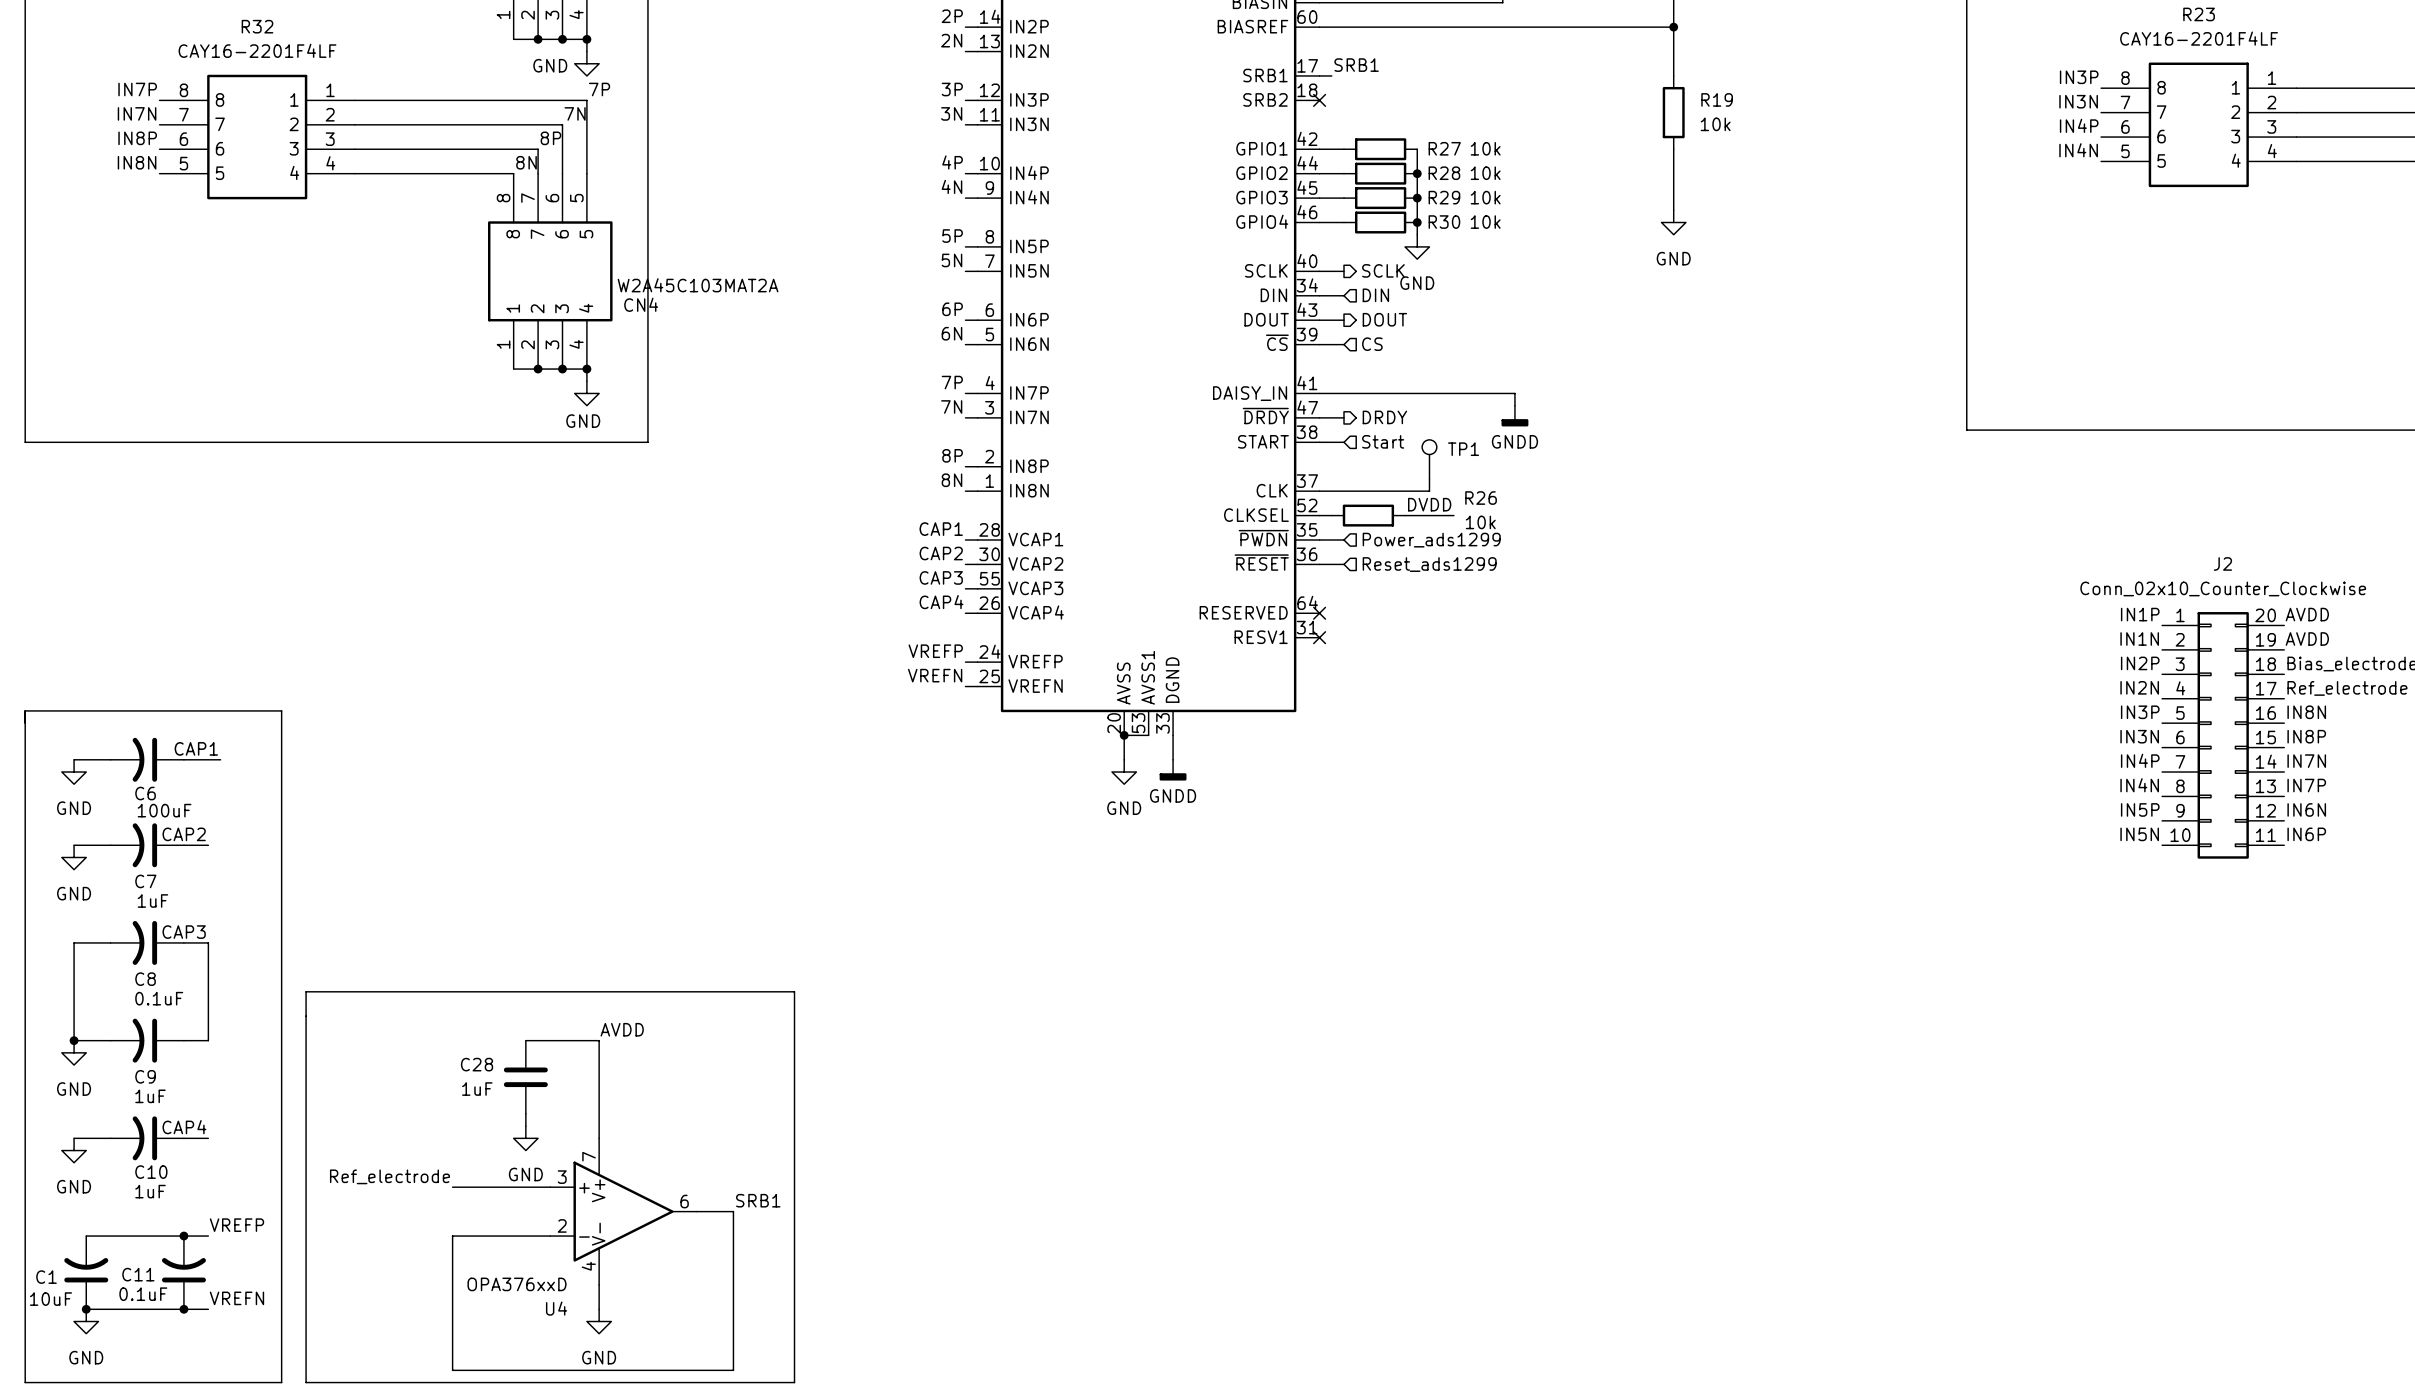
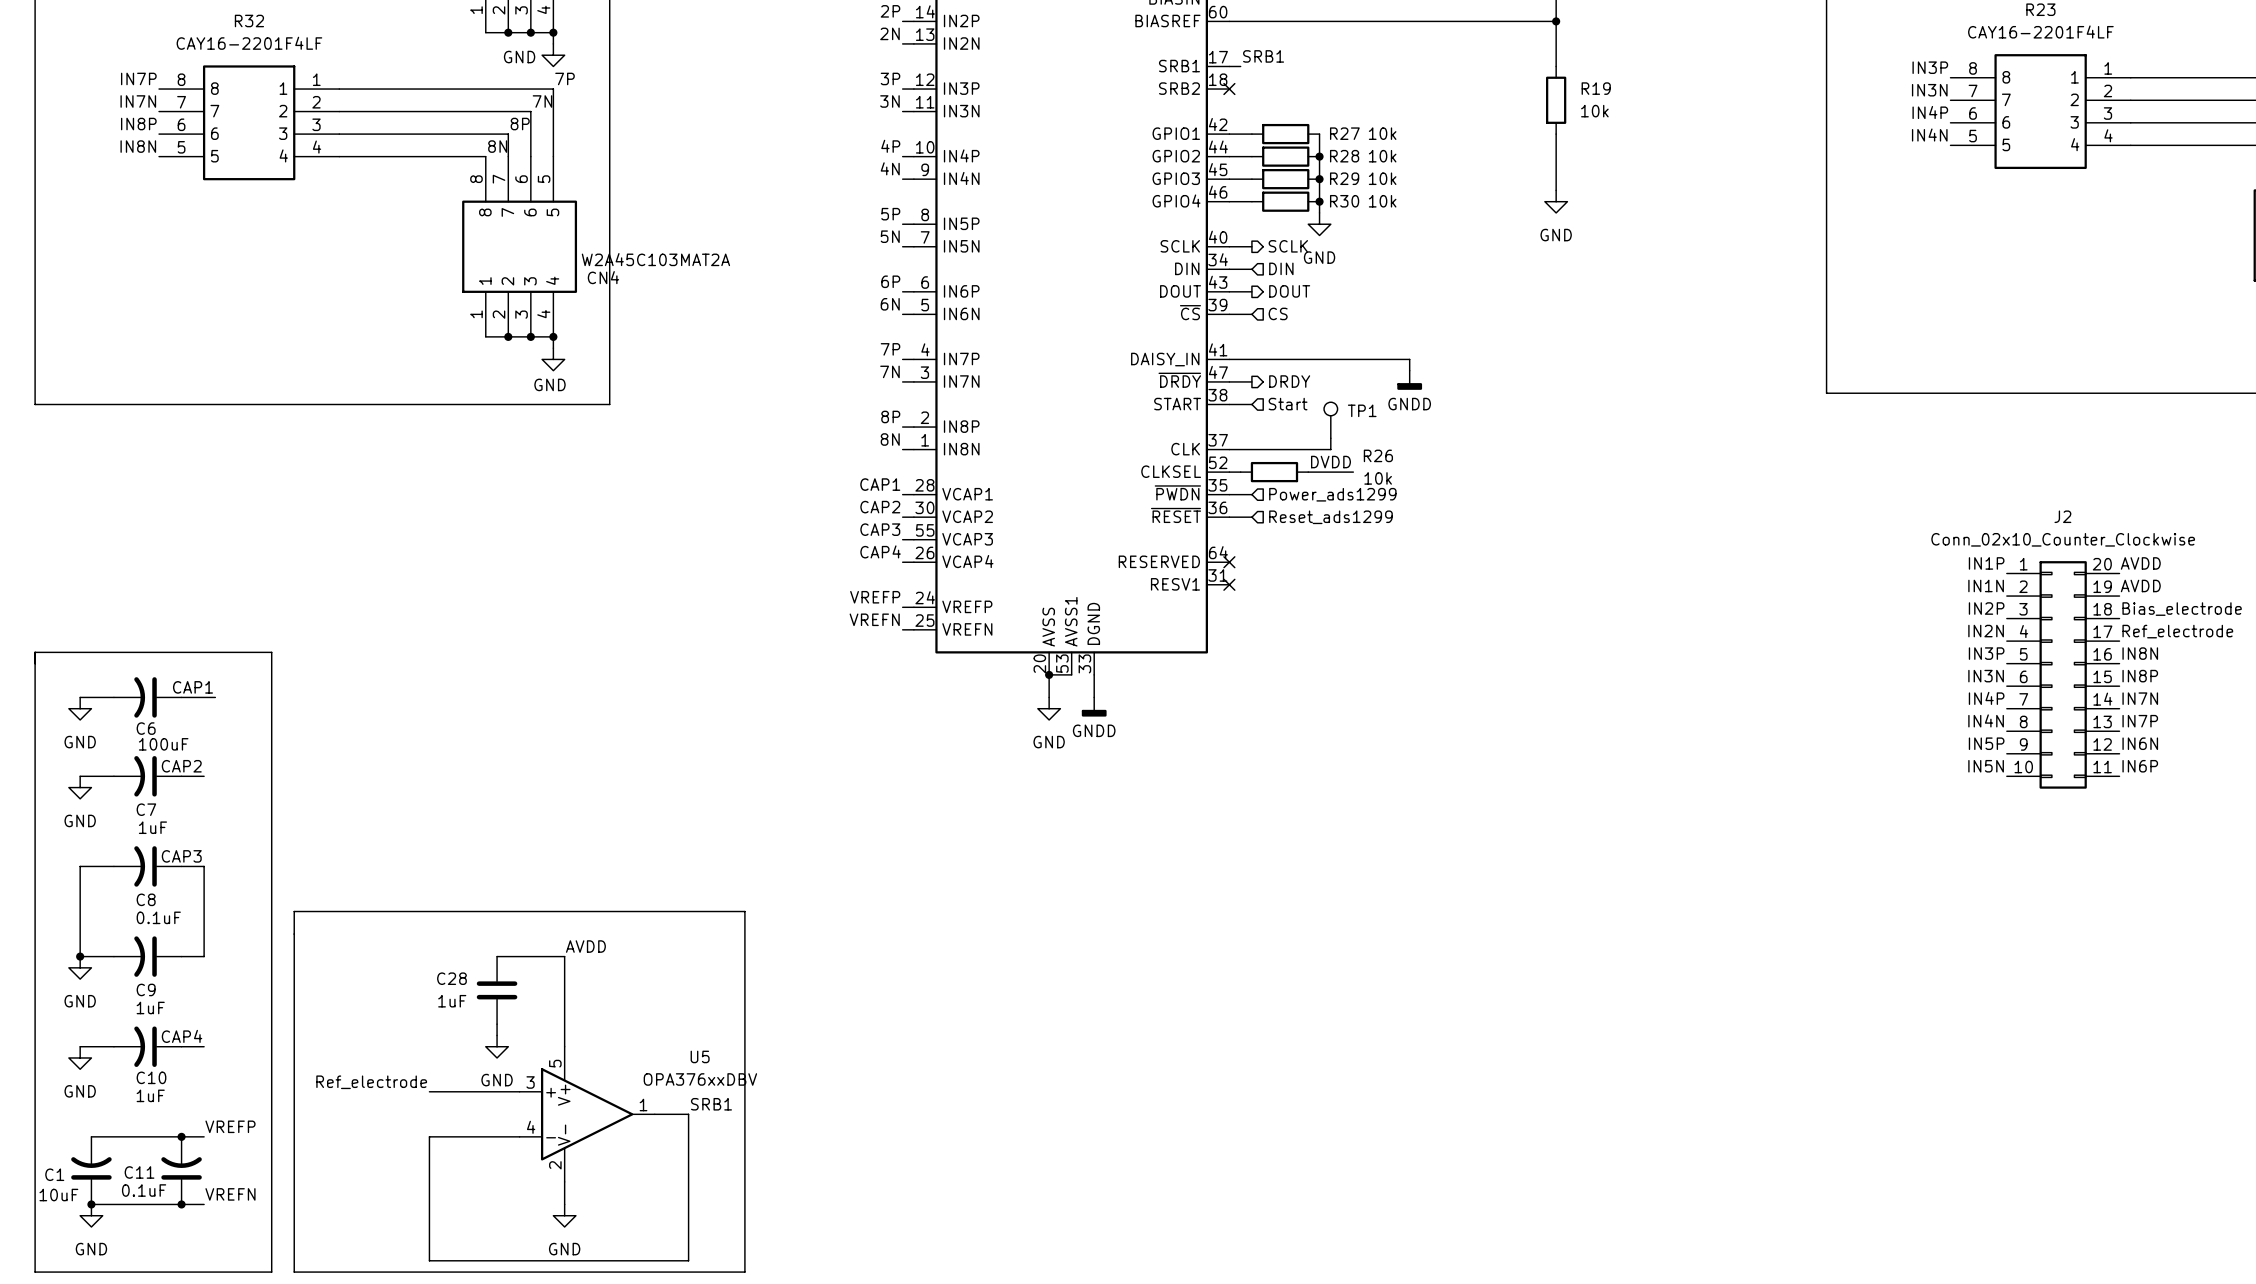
U4 pin number: 7 (589, 1156) -> 5 (555, 1063)
U4 pin number: 6 (684, 1201) -> 1 (643, 1105)
U4 pin number: 2 (562, 1225) -> 4 (531, 1127)
U4 pin number: 4 (588, 1266) -> 2 (555, 1165)
U4 value: OPA376xxD (517, 1284) -> OPA376xxDBV (700, 1079)
U4 name: U4 (556, 1308) -> U5 (700, 1056)

